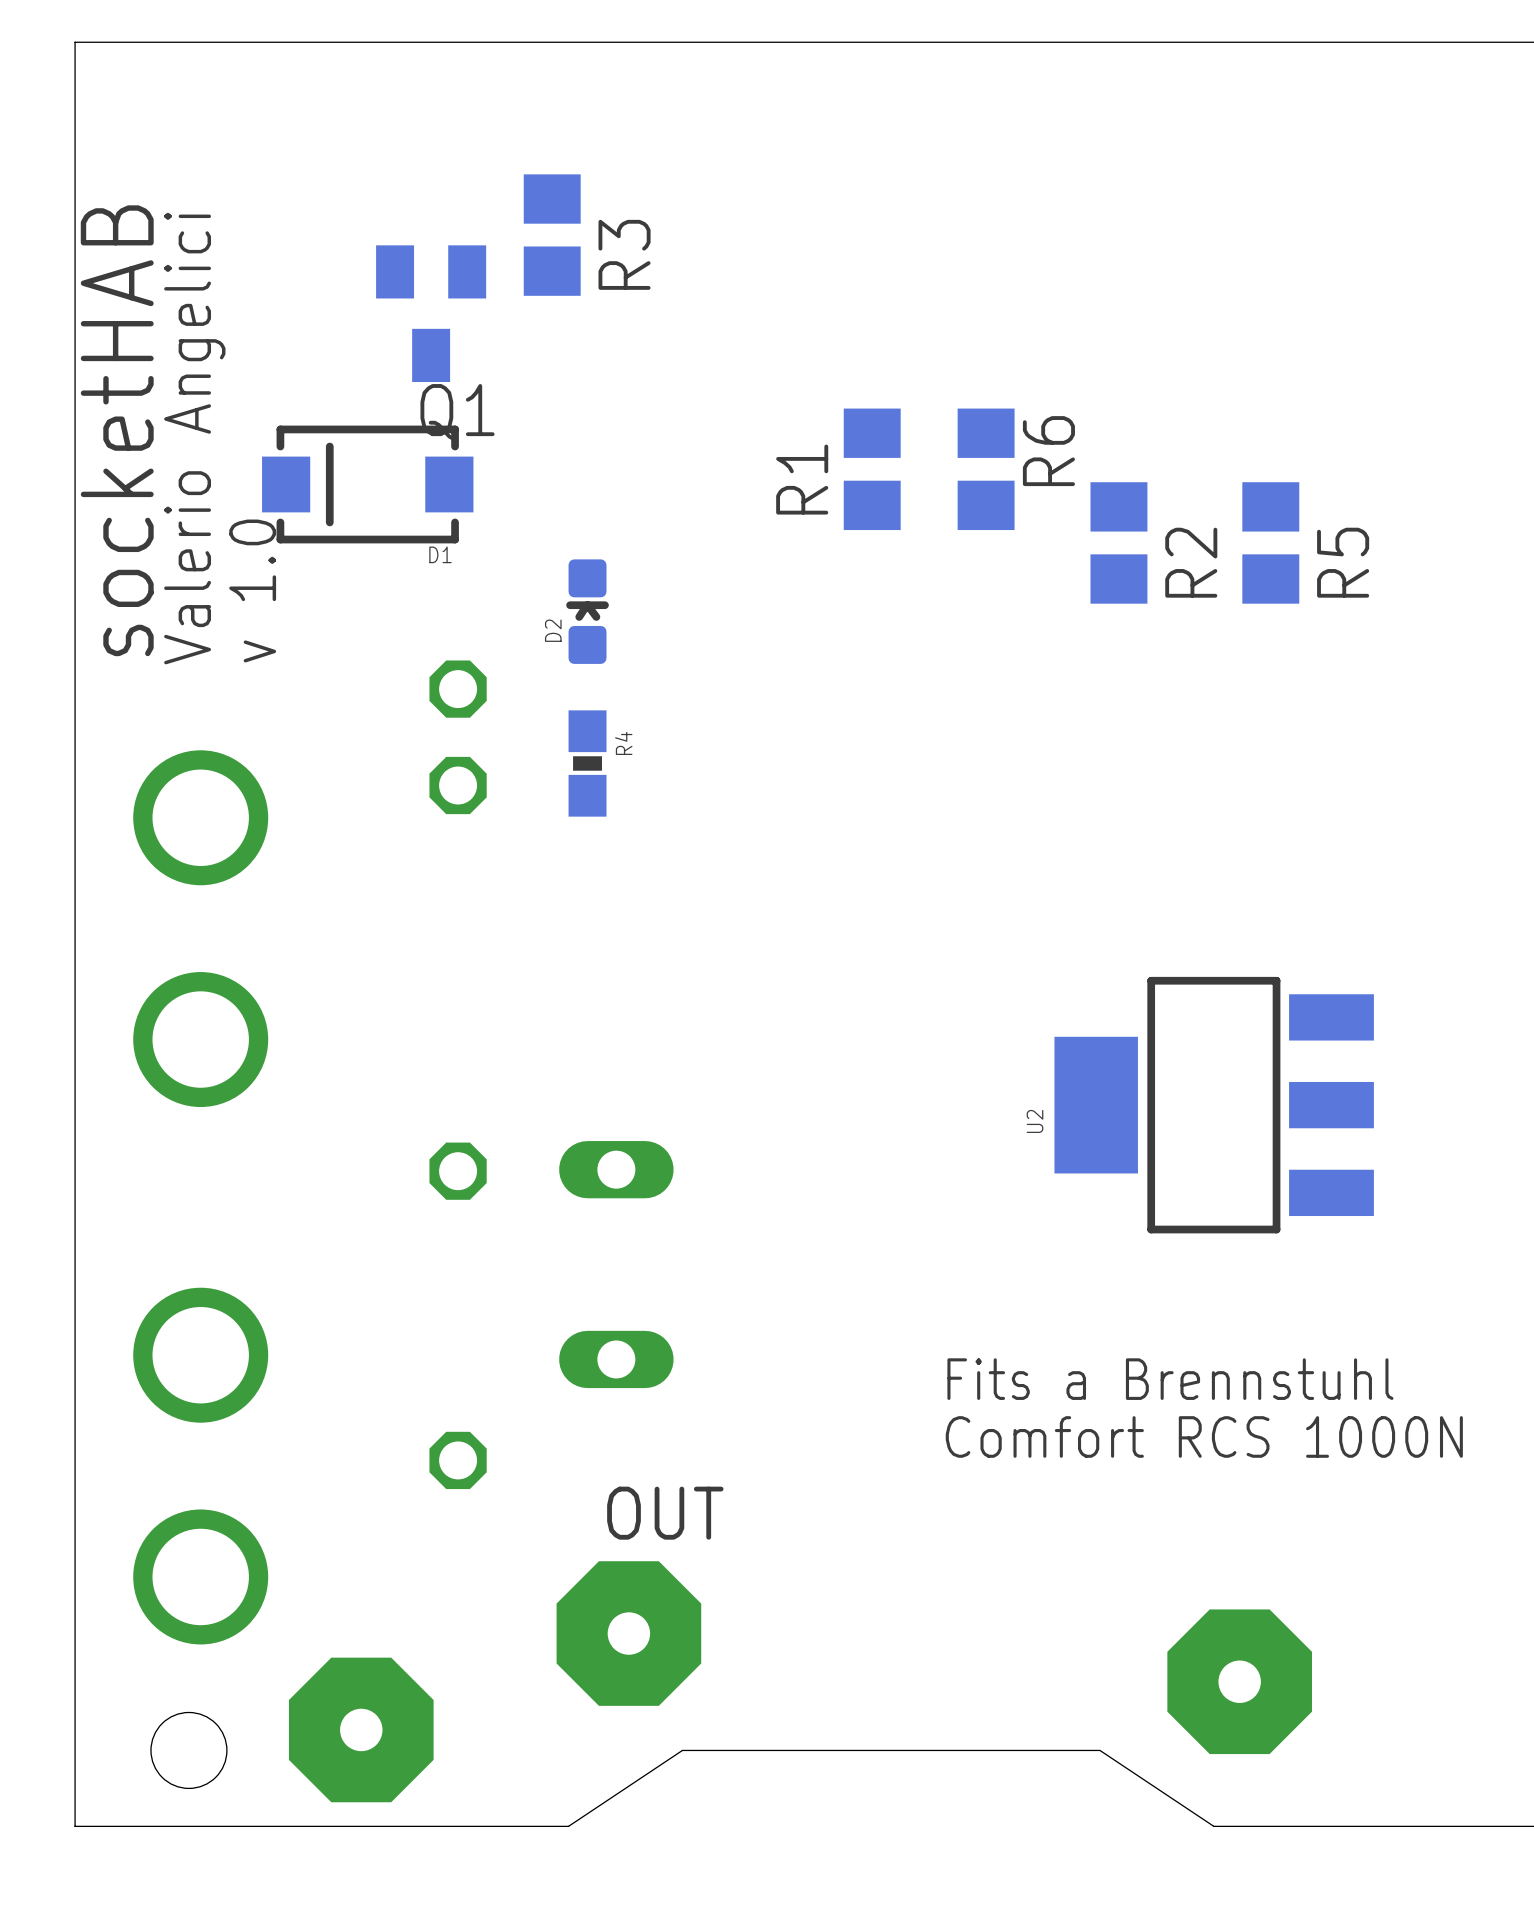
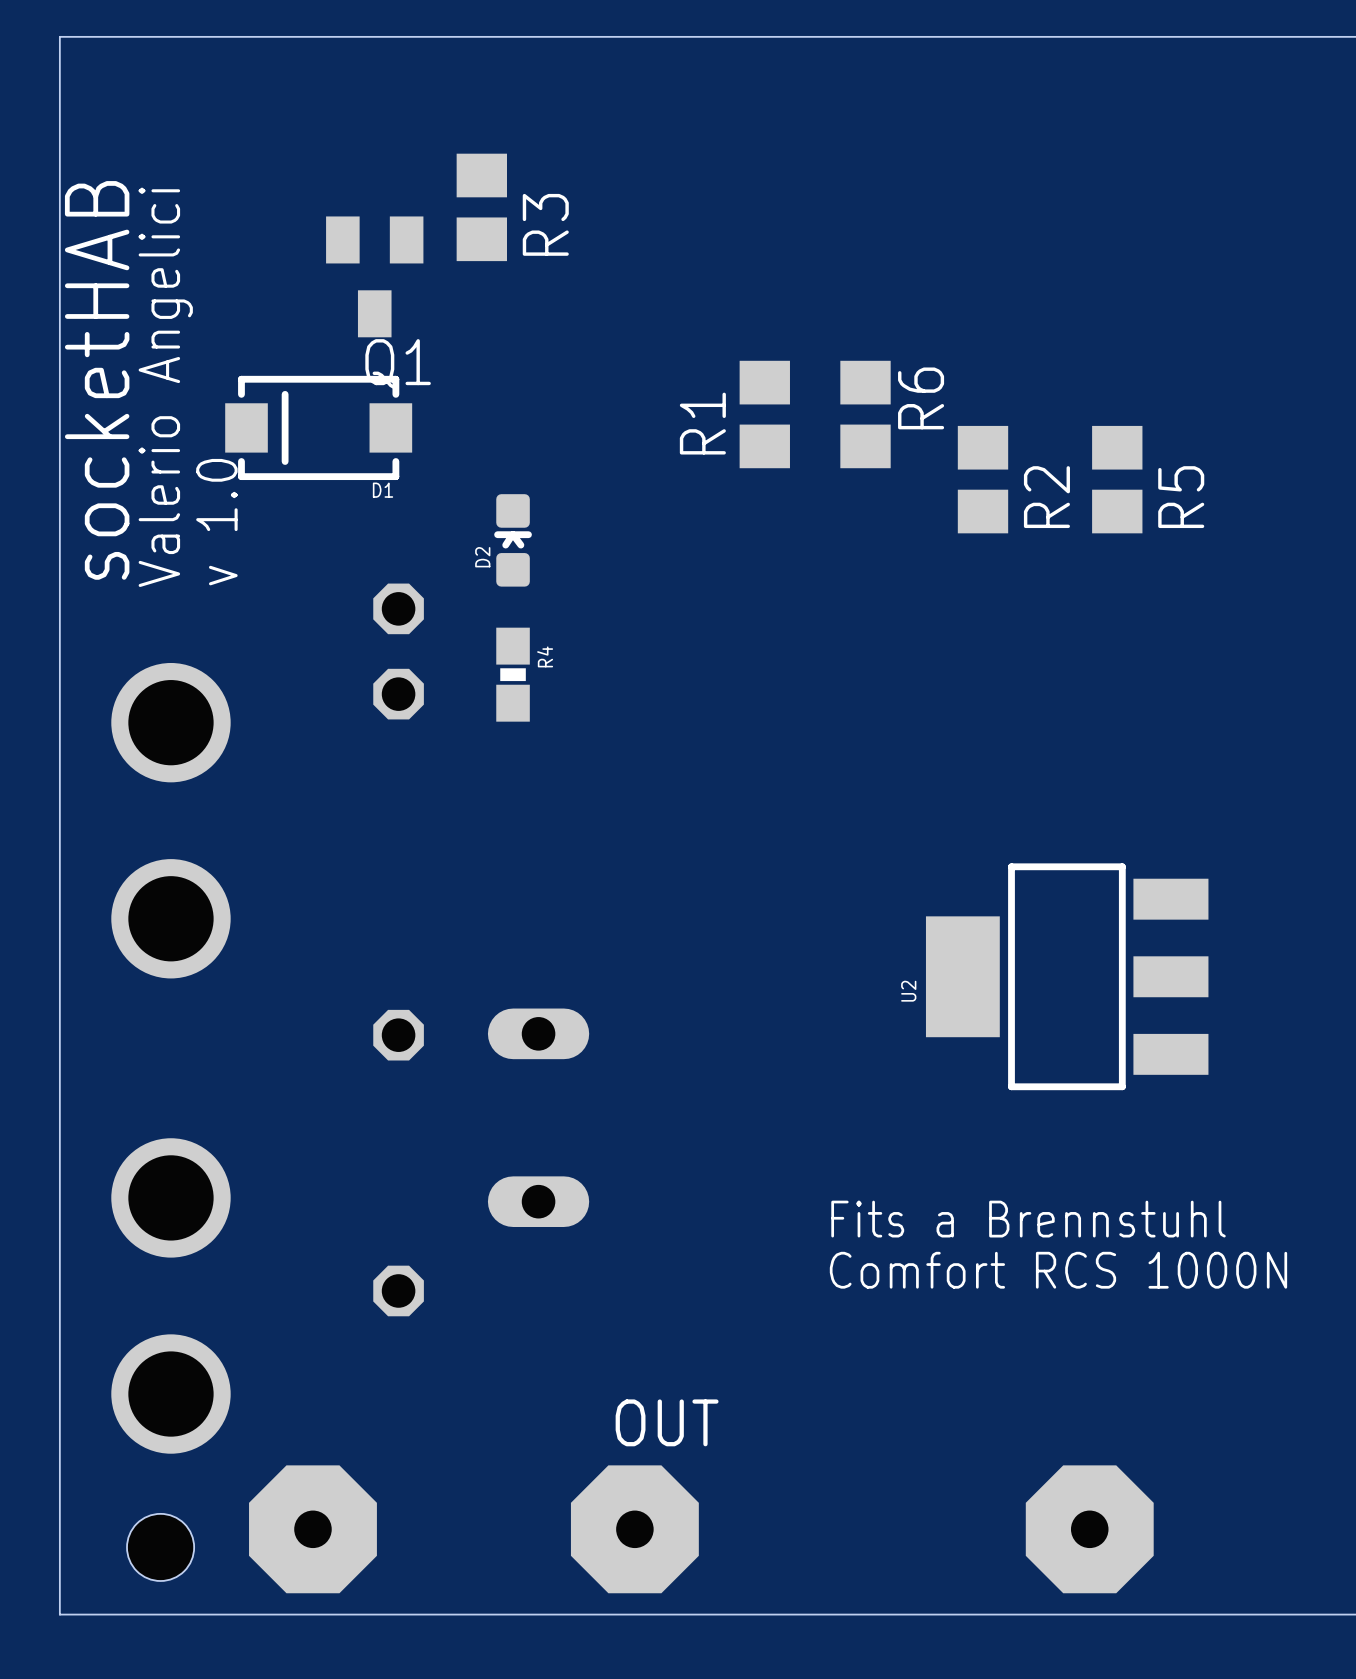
OUT position: (628, 1633) -> (634, 1529)
part position: (1239, 1681) -> (1089, 1529)
board edge: (1213, 1826) (1099, 1750) (682, 1750) (568, 1826) -> (1066, 1614) (496, 1614)

